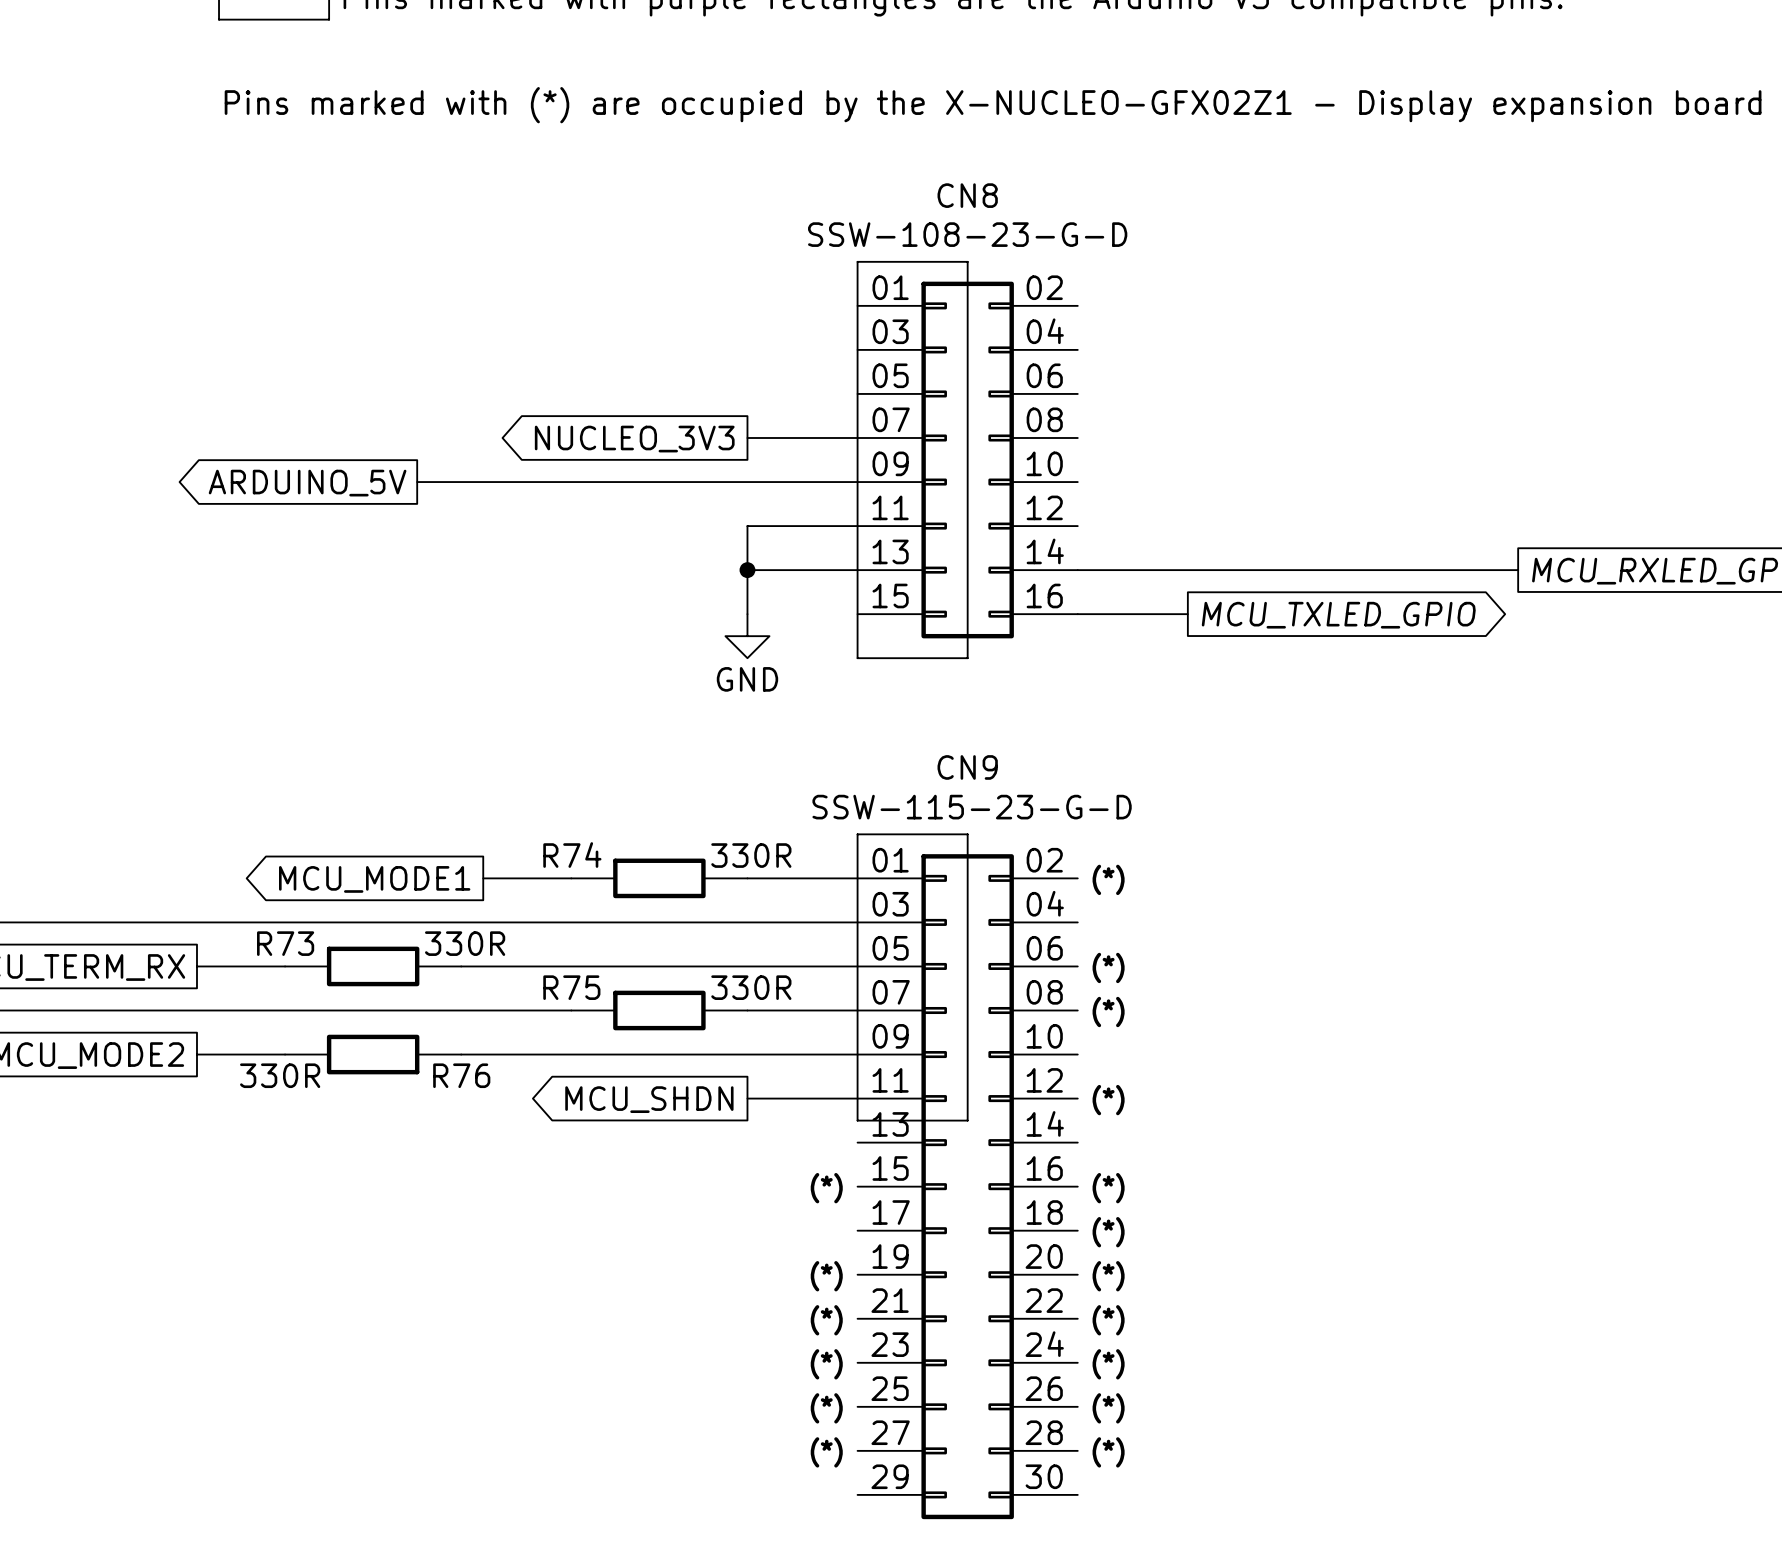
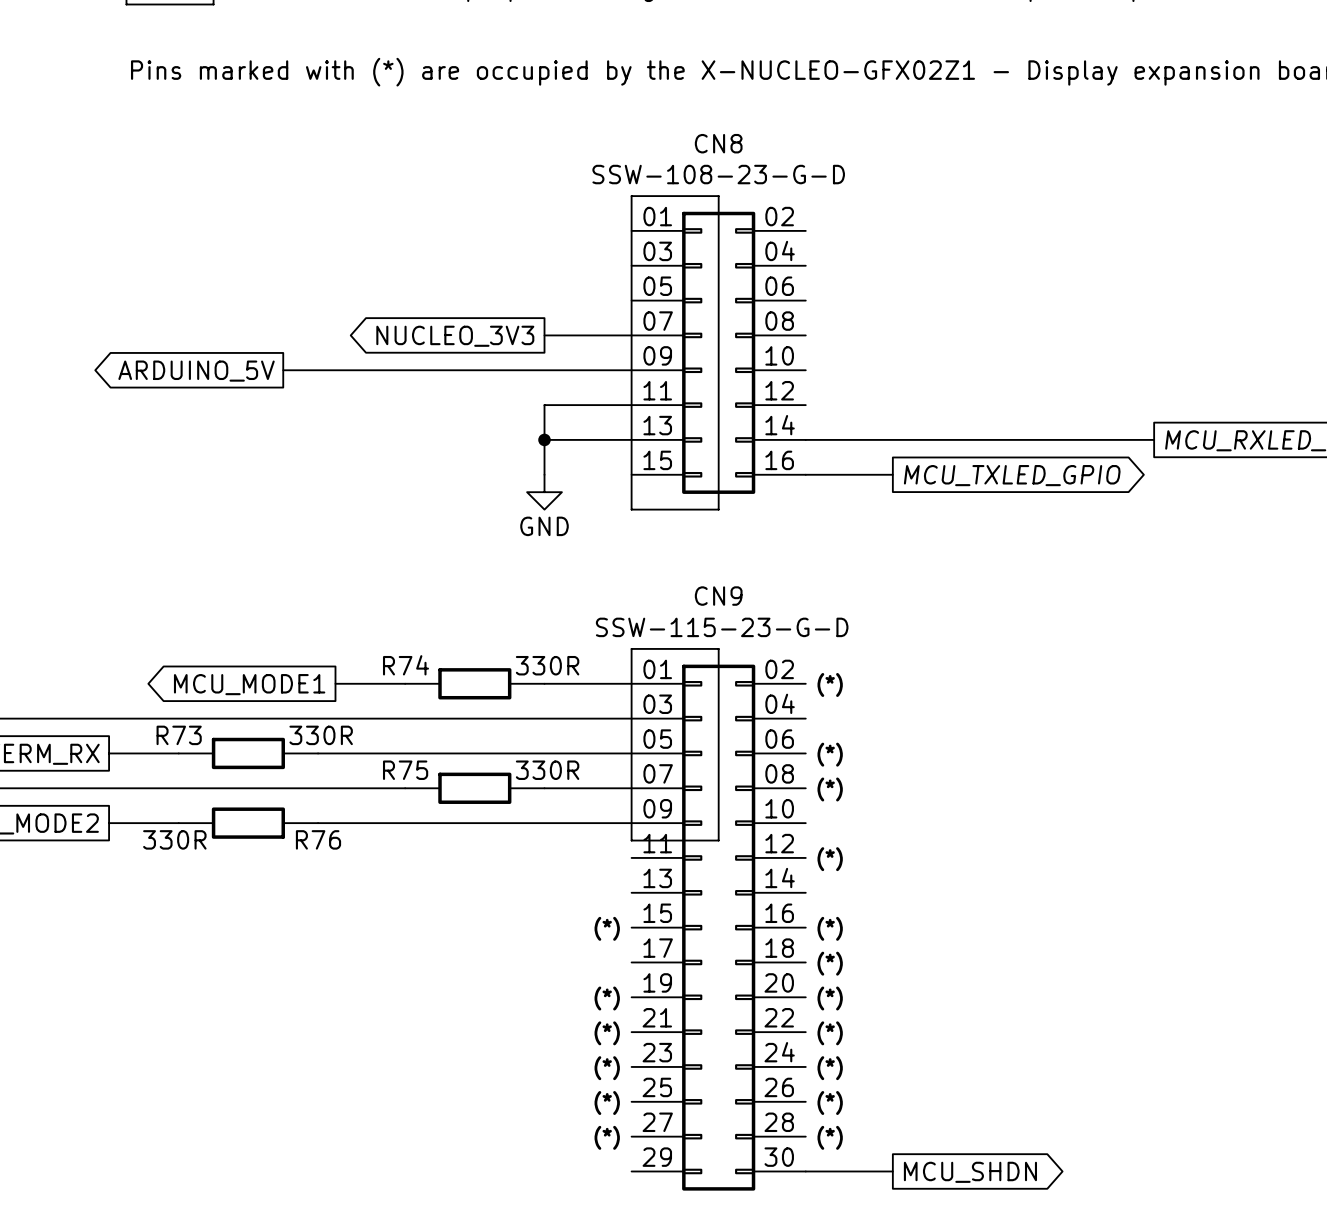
line: (857, 1076) (857, 1120) (967, 1120) (967, 1076) -> (631, 840) (718, 840)
wire: (747, 1098) (857, 1098) -> none
global label: MCU_SHDN (649, 1099) -> none
wire: none -> (805, 1171) (892, 1171)
global label: none -> MCU_SHDN (970, 1172)

